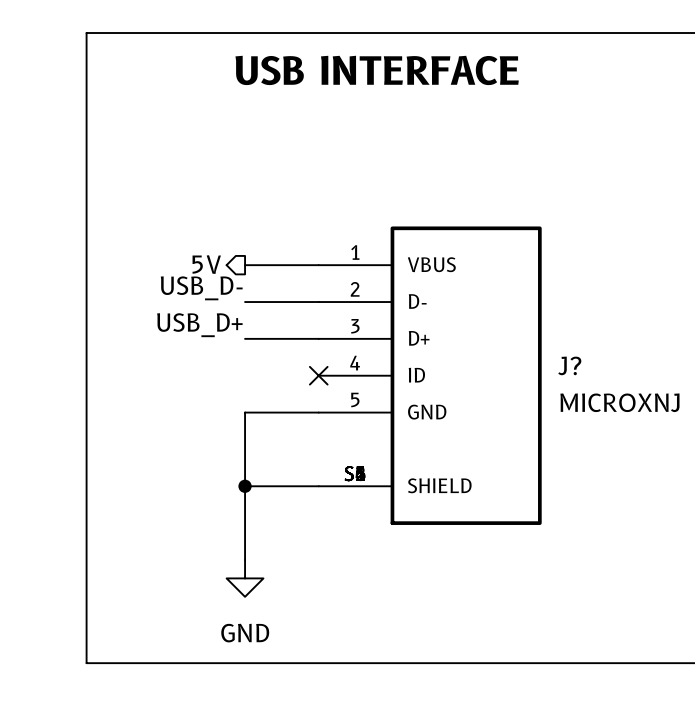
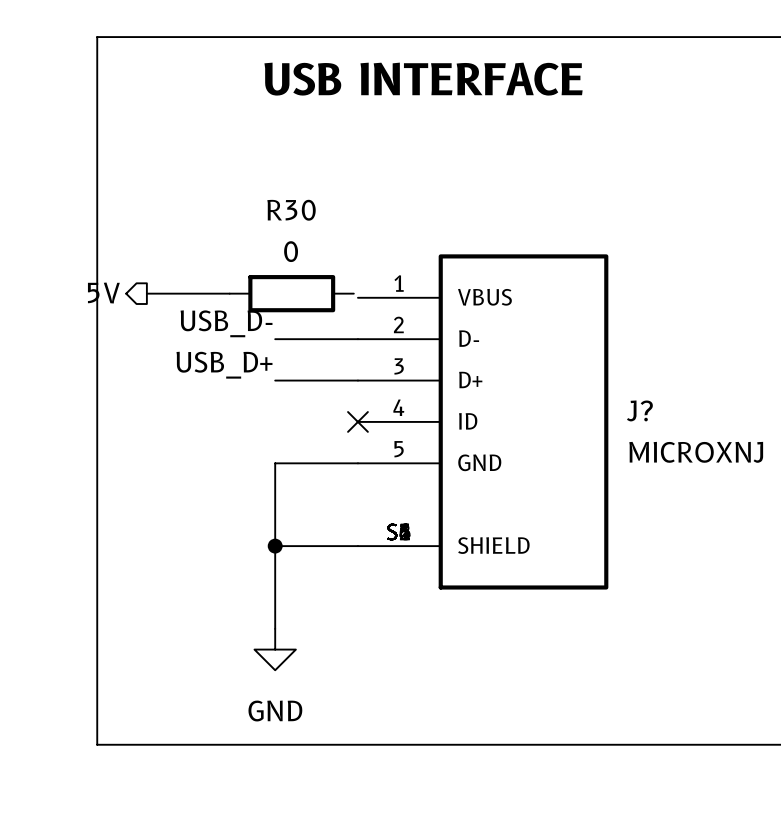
R30: none -> 0 (291, 293)
hierarchical label position: 5V (206, 264) -> 5V (103, 293)
wire: (245, 265) (318, 265) -> (146, 293) (229, 293)

